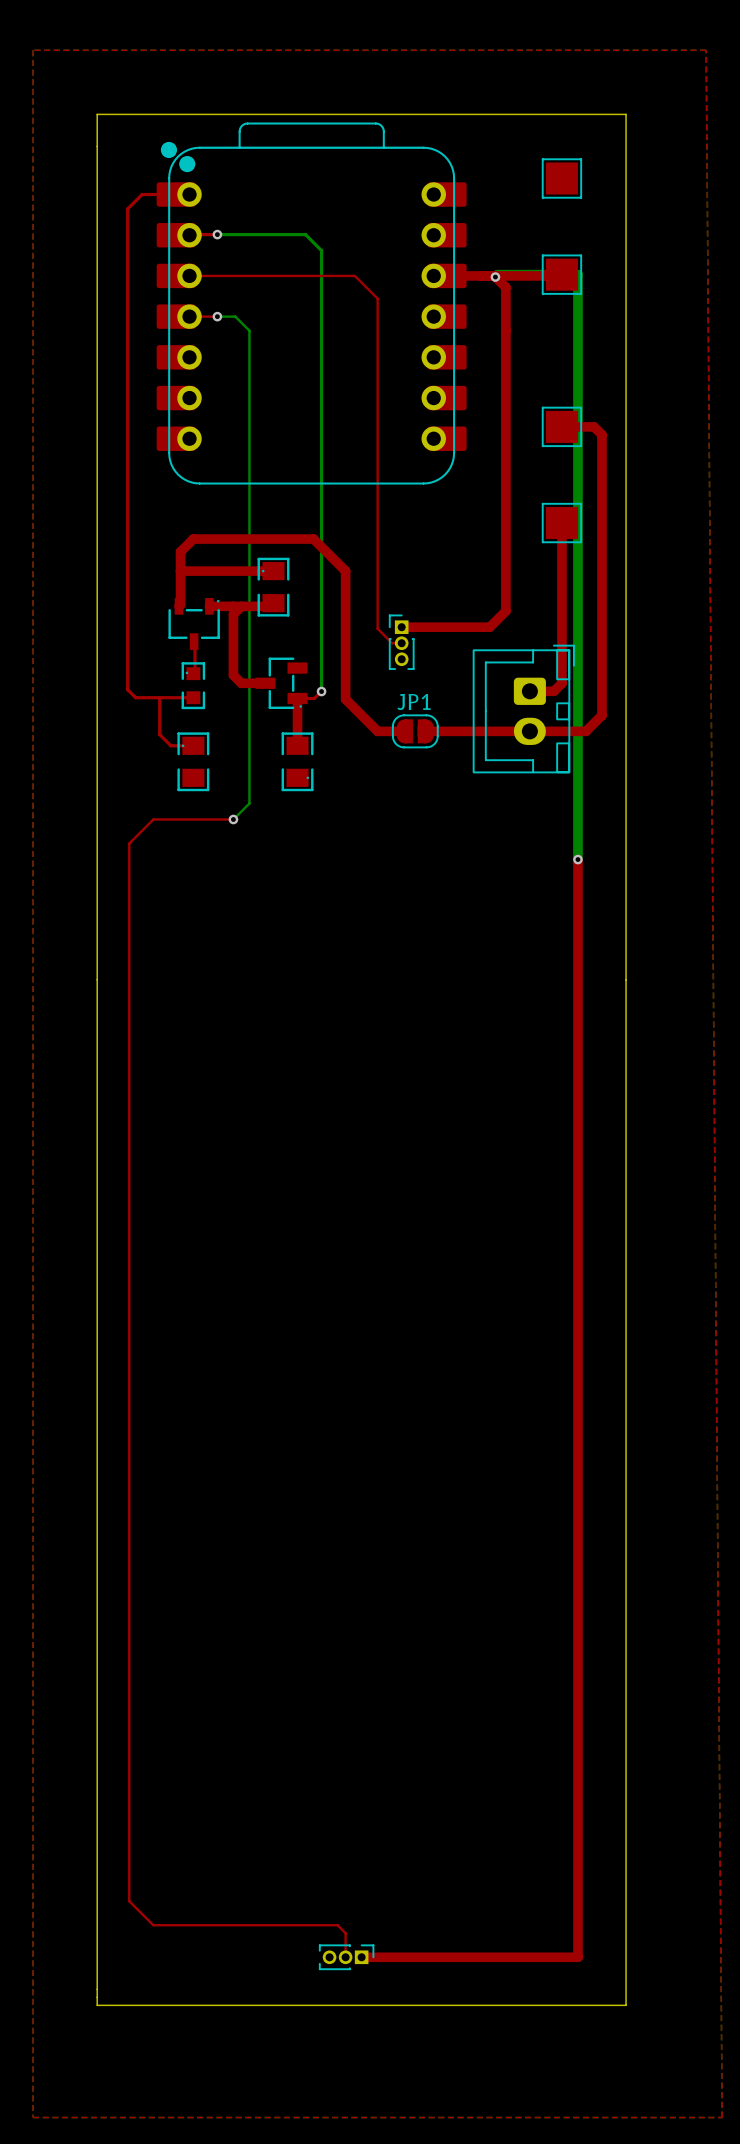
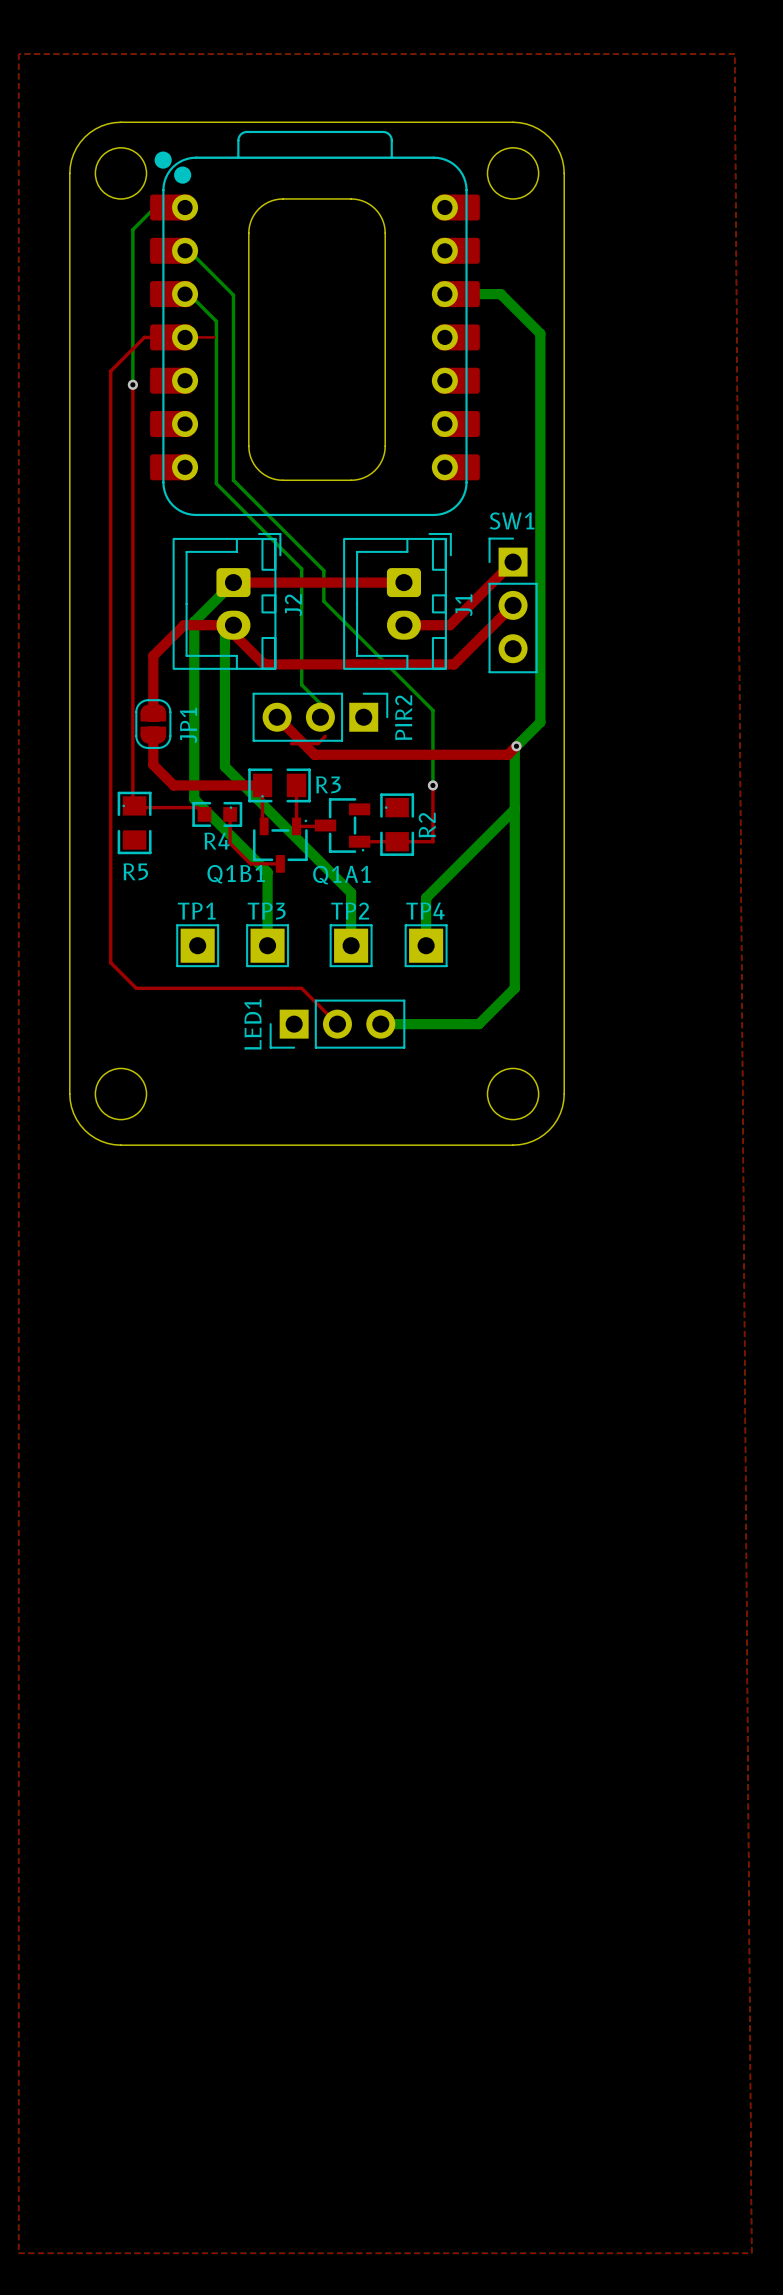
board edge: (129, 114) (97, 114) (97, 2005) (626, 2005) (626, 114) (497, 114) -> (120, 122) (101, 126) (84, 137) (73, 153) (69, 173) (69, 1094) (73, 1113) (84, 1130) (101, 1141) (120, 1145) (519, 1144) (532, 1141) (544, 1134) (553, 1125) (560, 1113) (564, 1094) (564, 173) (560, 153) (549, 137) (532, 126) (513, 122)
round board edge: none -> [94, 147, 147, 200]
round board edge: none -> [487, 147, 540, 200]
part: (561, 178) -> none
board edge: none -> (282, 198) (358, 199) (375, 208) (384, 225) (384, 450) (377, 467) (369, 475) (358, 479) (275, 479) (258, 470) (249, 453) (249, 229) (252, 218) (261, 206) (271, 200) (282, 198)
top track: (176, 194) (142, 194) (127, 208) (127, 689) (135, 697) (194, 697) -> none
bottom track: none -> (189, 207) (155, 207) (132, 229) (132, 384)
top track: (190, 234) (217, 234) -> none
bottom track: (217, 234) (305, 234) (321, 250) (321, 691) -> none
via: (217, 234) -> none
bottom track: none -> (189, 250) (233, 295) (233, 480) (323, 570) (323, 601) (432, 710) (432, 785)
top track: (545, 274) (433, 275) -> none
part: (561, 274) -> none
top track: (189, 275) (354, 275) (377, 298) (377, 628) (392, 643) (401, 643) -> none
bottom track: none -> (189, 294) (216, 321) (216, 483) (301, 568) (301, 684) (320, 703) (320, 717)
bottom track: none -> (448, 294) (500, 294) (540, 333) (540, 722) (514, 747) (514, 988) (478, 1024) (380, 1024)
top track: (494, 275) (505, 287) (505, 611) (489, 627) (401, 627) -> none
bottom track: (495, 277) (497, 274) (577, 274) (577, 859) -> none
via: (495, 277) -> none
top track: none -> (174, 337) (144, 337) (110, 371) (110, 962) (136, 988) (301, 988) (337, 1024)
bottom track: (217, 316) (235, 316) (249, 330) (249, 803) (233, 819) -> none
via: (217, 316) -> none
top track: none -> (132, 384) (132, 799)
via: none -> (132, 384)
top track: (561, 426) (593, 426) (602, 434) (602, 715) (585, 731) (425, 731) -> none
part: (561, 426) -> none
top track: (561, 523) (561, 683) (553, 691) (529, 691) -> none
part: (561, 523) -> none
top track: none -> (513, 562) (449, 625) (403, 625)
top track: none -> (233, 582) (403, 582)
bottom track: none -> (233, 582) (194, 621) (194, 799) (267, 872) (267, 945)
J2: none -> (226, 601)
J1: none -> (397, 601)
top track: none -> (513, 605) (454, 664) (264, 664) (233, 633) (233, 625) (184, 625) (153, 655) (153, 712)
SW1: none -> (513, 605)
top track: (180, 571) (273, 571) -> none
bottom track: none -> (233, 625) (224, 633) (224, 766) (351, 892) (351, 945)
part: (273, 587) -> none
top track: (273, 603) (270, 606) (209, 606) -> none
top track: (178, 606) (180, 604) (180, 551) (193, 539) (313, 539) (345, 571) (345, 699) (377, 731) (404, 731) -> none
top track: (241, 606) (233, 614) (233, 675) (241, 683) (257, 683) -> none
part: (194, 623) -> none
top track: (194, 641) (194, 673) -> none
part: (401, 642) -> none
top track: none -> (277, 717) (314, 754) (507, 754) (516, 746)
PIR2: none -> (320, 717)
part: (281, 683) -> none
part: (193, 685) -> none
via: (321, 691) -> none
top track width: thin (159, 697) (159, 718) -> thick (153, 742) (153, 764)
top track: (297, 698) (297, 745) -> none
via: none -> (516, 746)
part: (523, 709) -> none
top track: (159, 718) (159, 734) (170, 745) (193, 745) -> (153, 764) (173, 785) (262, 785) (262, 824) (264, 826)
JP1 rotation: 0° (415, 731) -> 90° clockwise (153, 724)
JP1 position: (415, 731) -> (153, 724)
R3: none -> (279, 785)
top track: none -> (296, 785) (296, 826) (325, 825)
top track: none -> (432, 785) (432, 841) (354, 842)
via: none -> (432, 785)
top track: none -> (136, 807) (197, 807) (204, 814)
bottom track: none -> (514, 809) (426, 897) (426, 945)
part: (193, 761) -> none
part: (297, 761) -> none
R4: none -> (217, 814)
top track: none -> (230, 814) (230, 843) (250, 863) (280, 863)
R5: none -> (134, 822)
R2: none -> (397, 824)
Q1A1: none -> (342, 825)
Q1B1: none -> (280, 845)
top track: (233, 819) (153, 819) (129, 843) (129, 1901) (153, 1925) (337, 1925) (345, 1933) (345, 1957) -> none
via: (233, 819) -> none
top track: (577, 859) (577, 1957) (361, 1957) -> none
via: (577, 859) -> none
TP1: none -> (197, 945)
TP3: none -> (267, 945)
TP2: none -> (351, 945)
TP4: none -> (426, 945)
LED1: none -> (337, 1024)
round board edge: none -> [94, 1068, 147, 1121]
round board edge: none -> [487, 1068, 540, 1121]
part: (346, 1957) -> none

